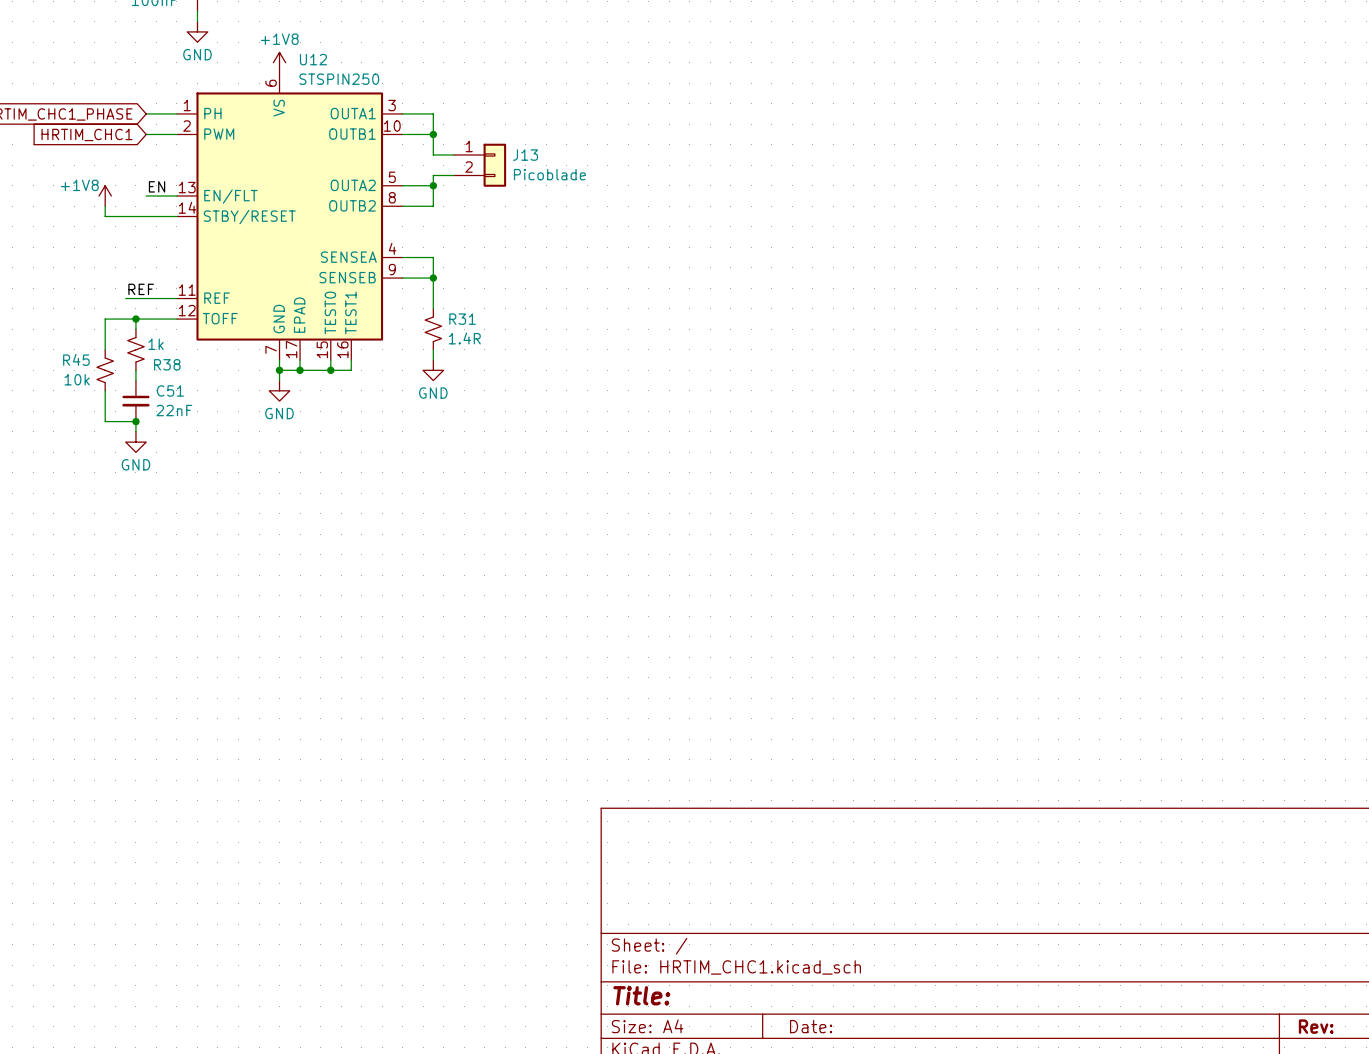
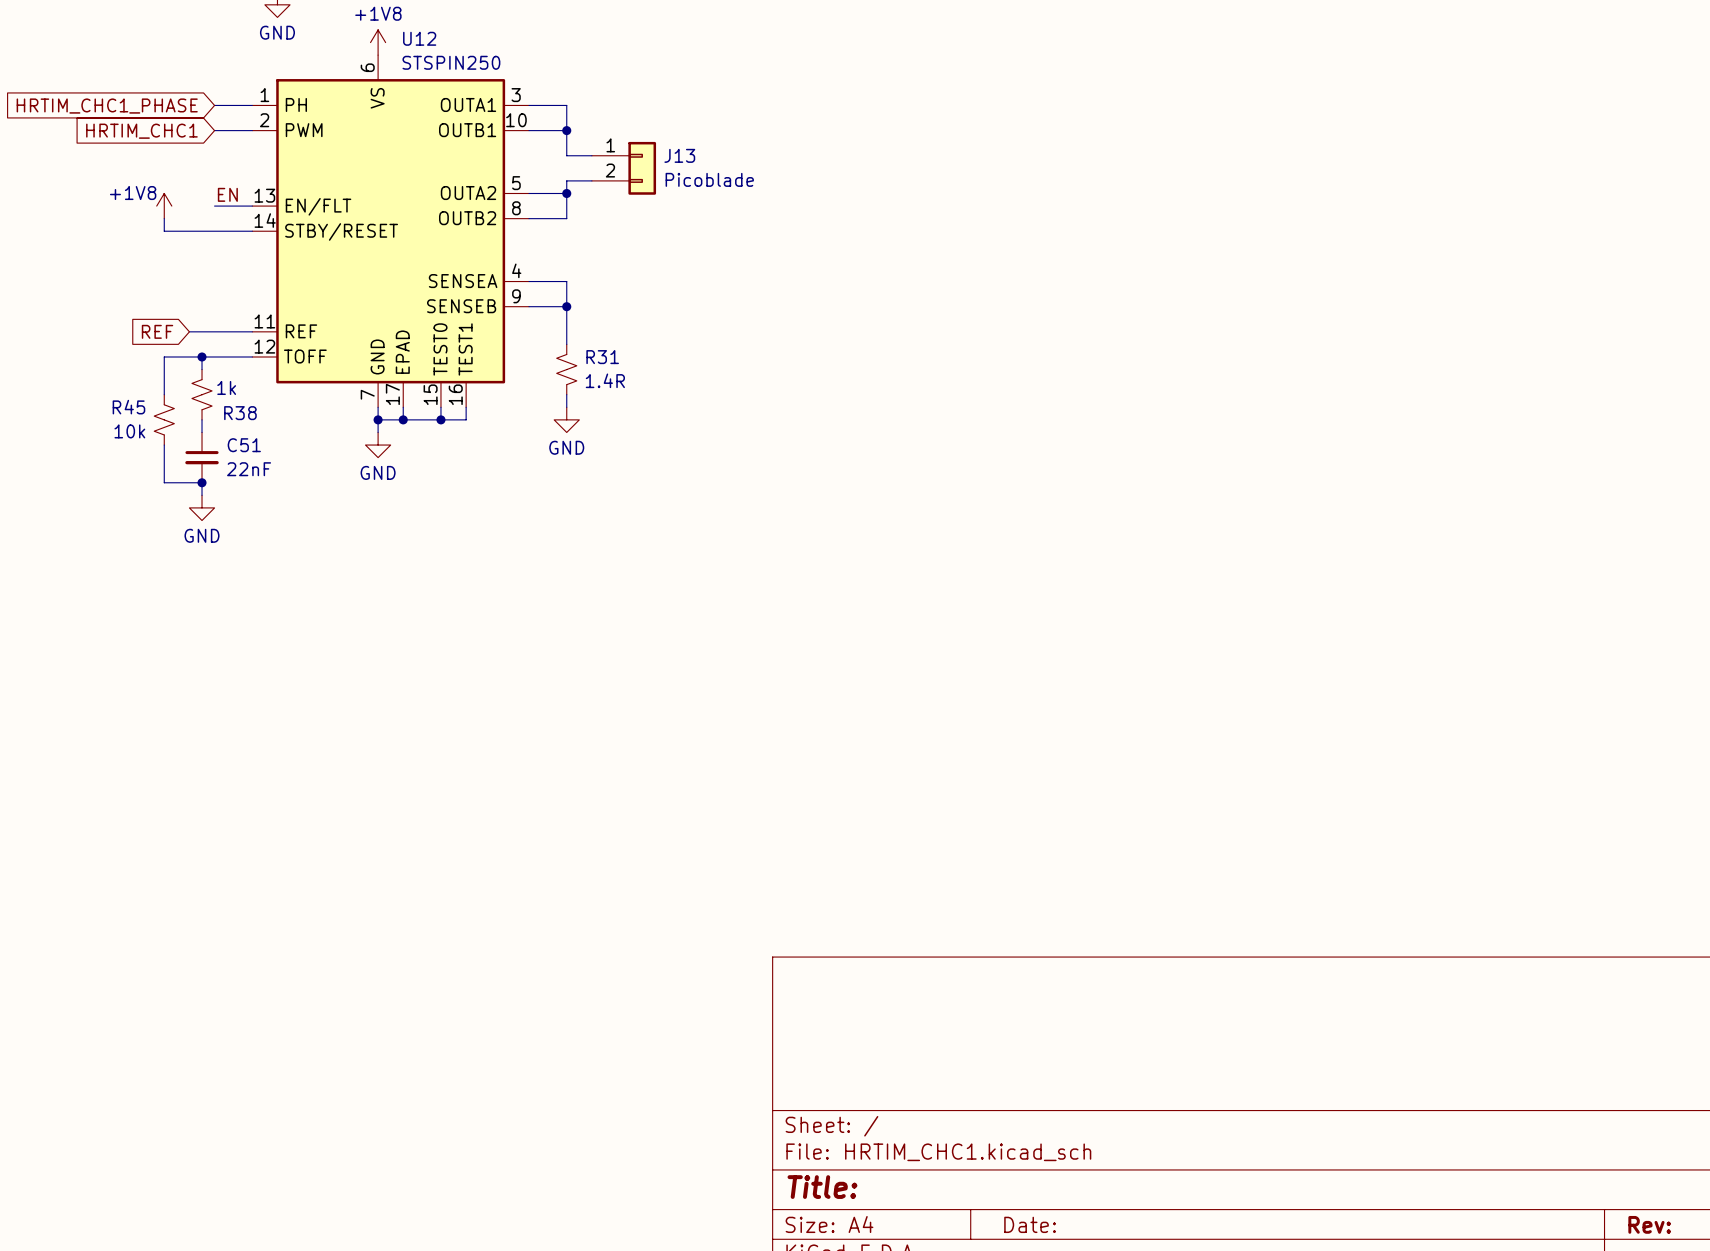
label: REF (141, 289) -> none
global label: none -> REF (157, 331)

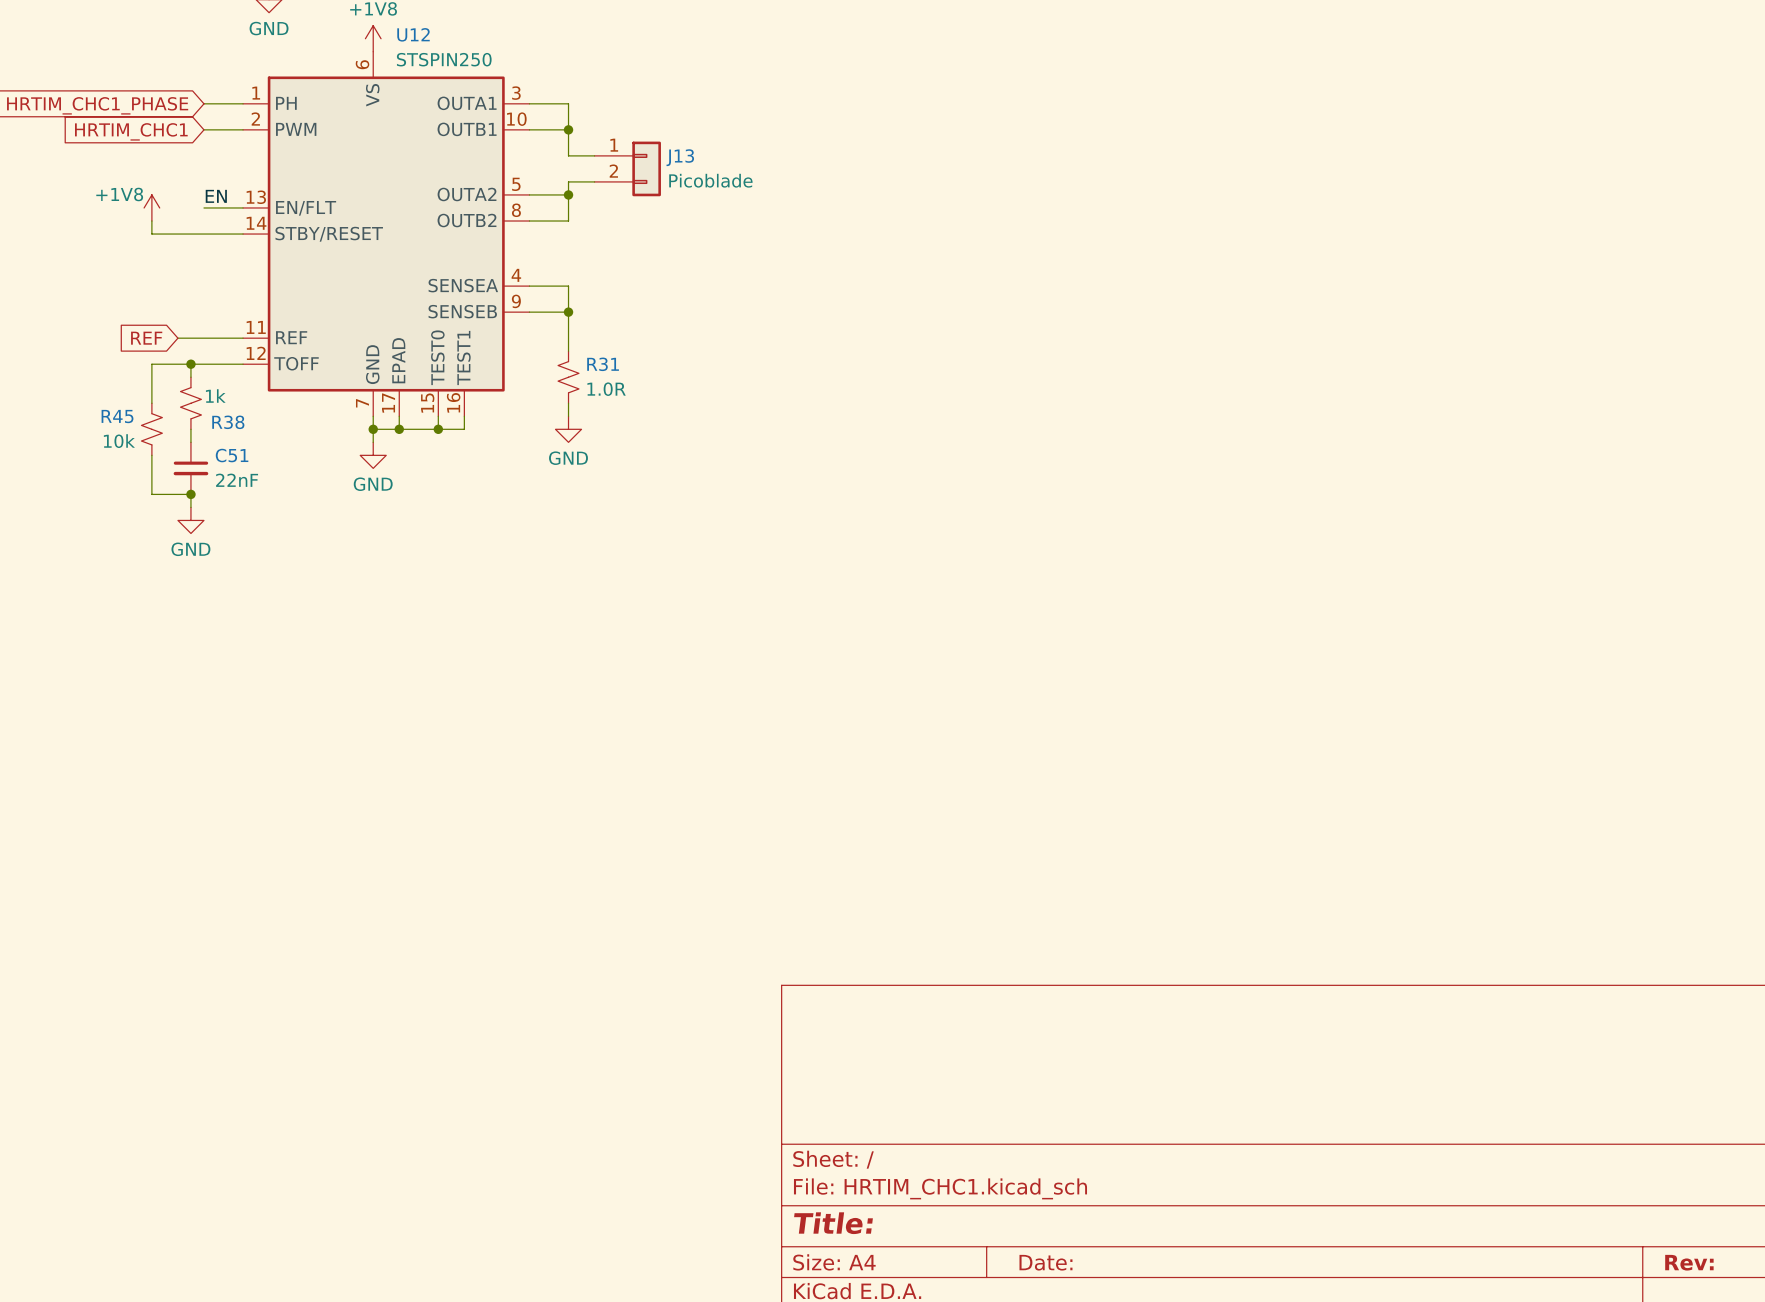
R31 value: 1.4R (605, 380) -> 1.0R (606, 389)

